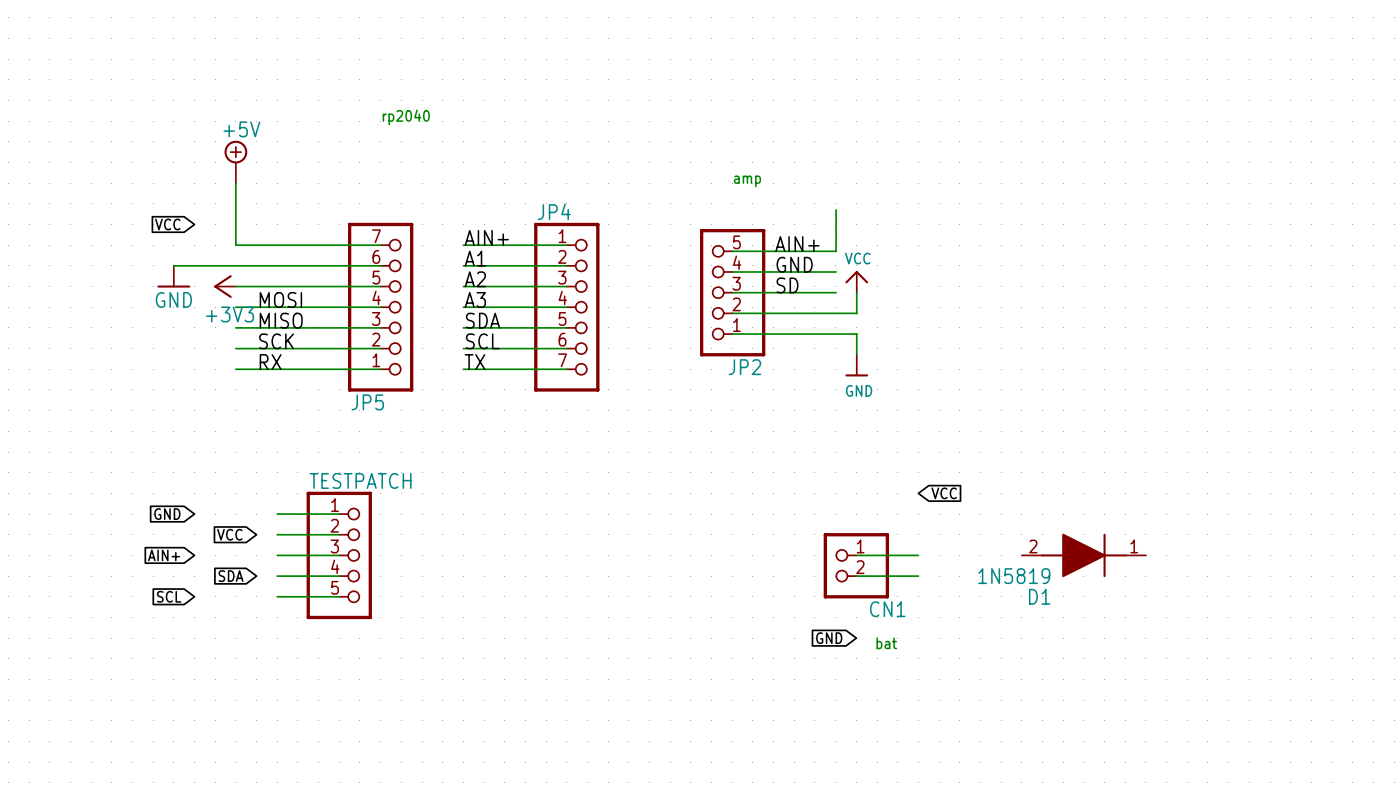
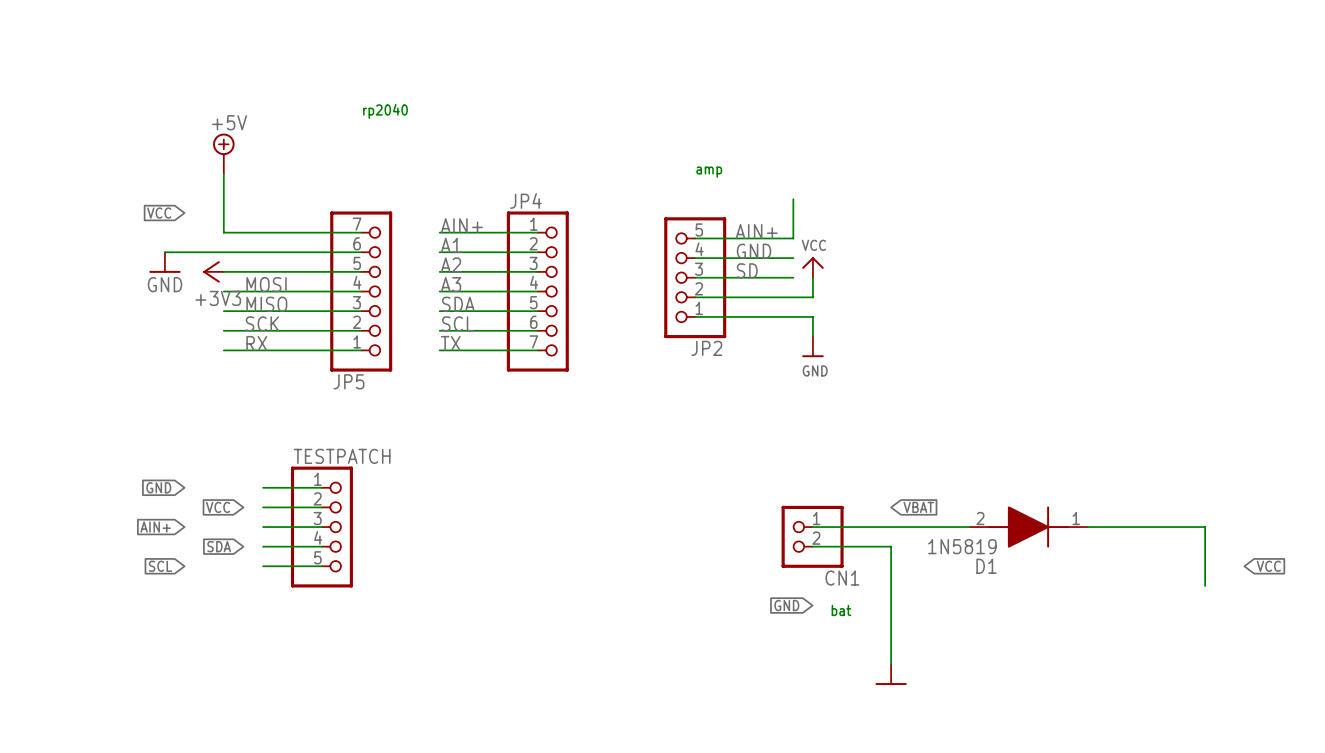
global label: VCC (944, 493) -> none
global label: none -> VBAT (918, 507)
wire: none -> (871, 527) (969, 527)
wire: none -> (1087, 527) (1205, 527) (1205, 585)
wire: none -> (871, 546) (891, 546) (891, 664)
global label: none -> VCC (1268, 566)
power symbol: none -> (891, 674)

